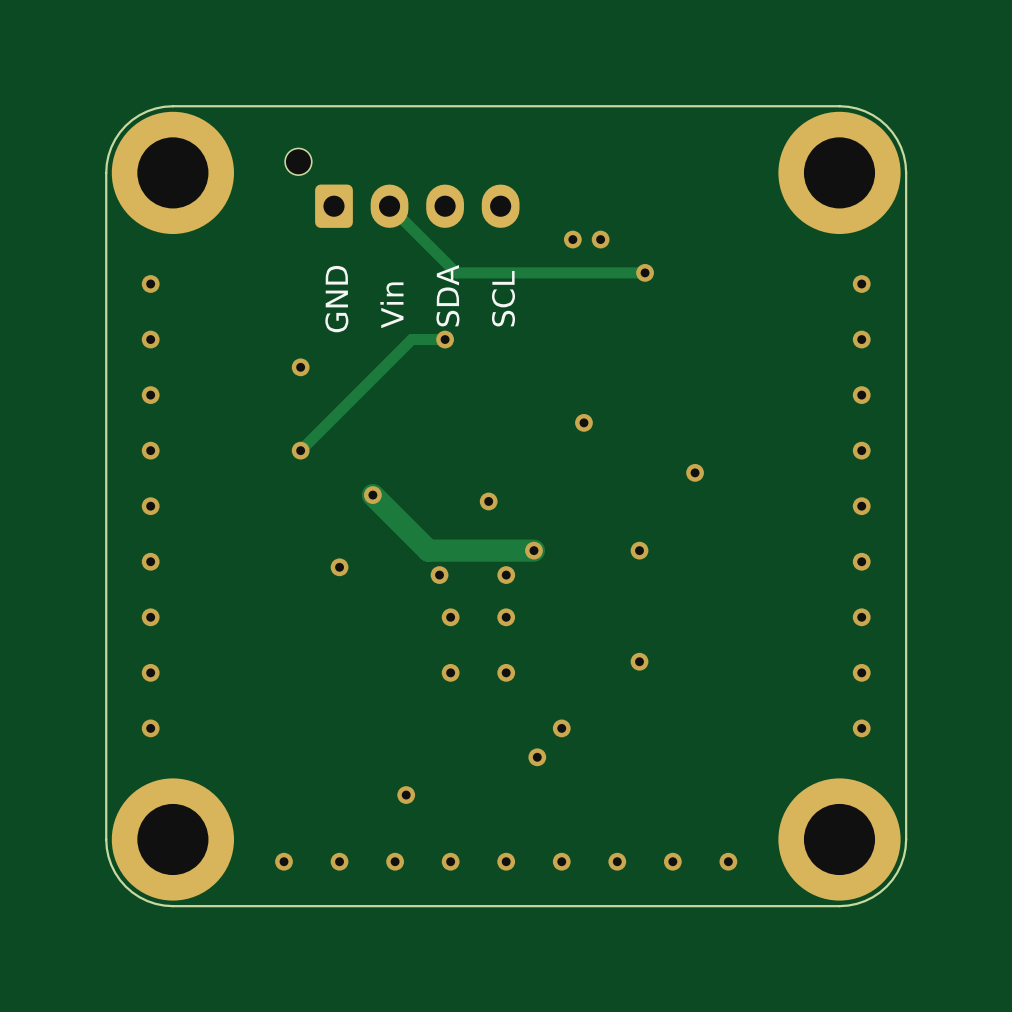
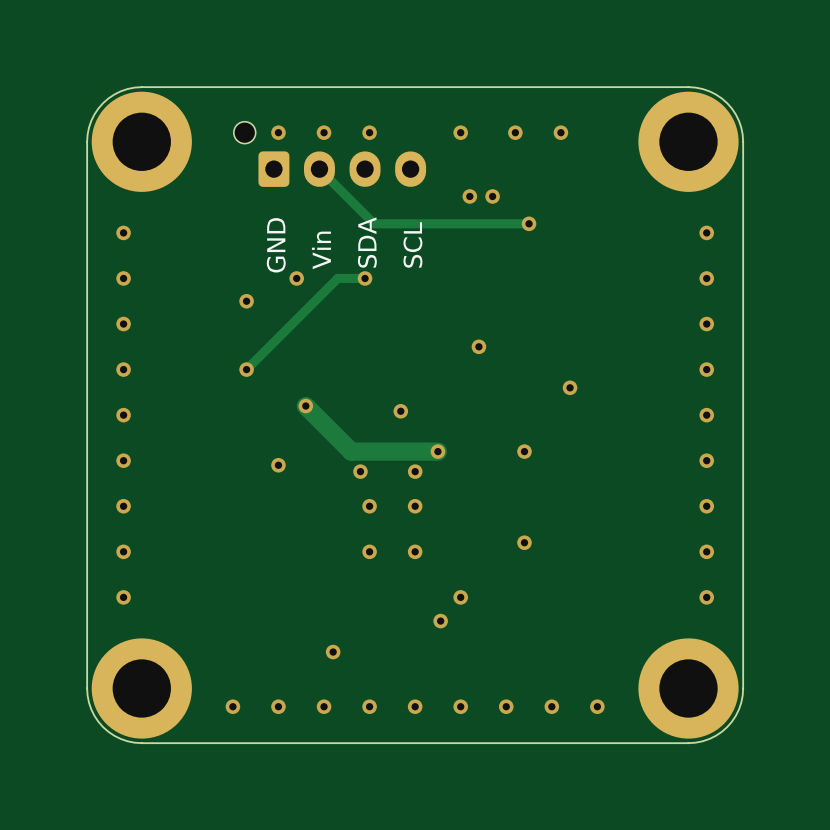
via: none -> (278, 132)
via: none -> (324, 132)
via: none -> (369, 132)
via: none -> (460, 132)
via: none -> (515, 132)
via: none -> (560, 132)
via: none -> (296, 278)

